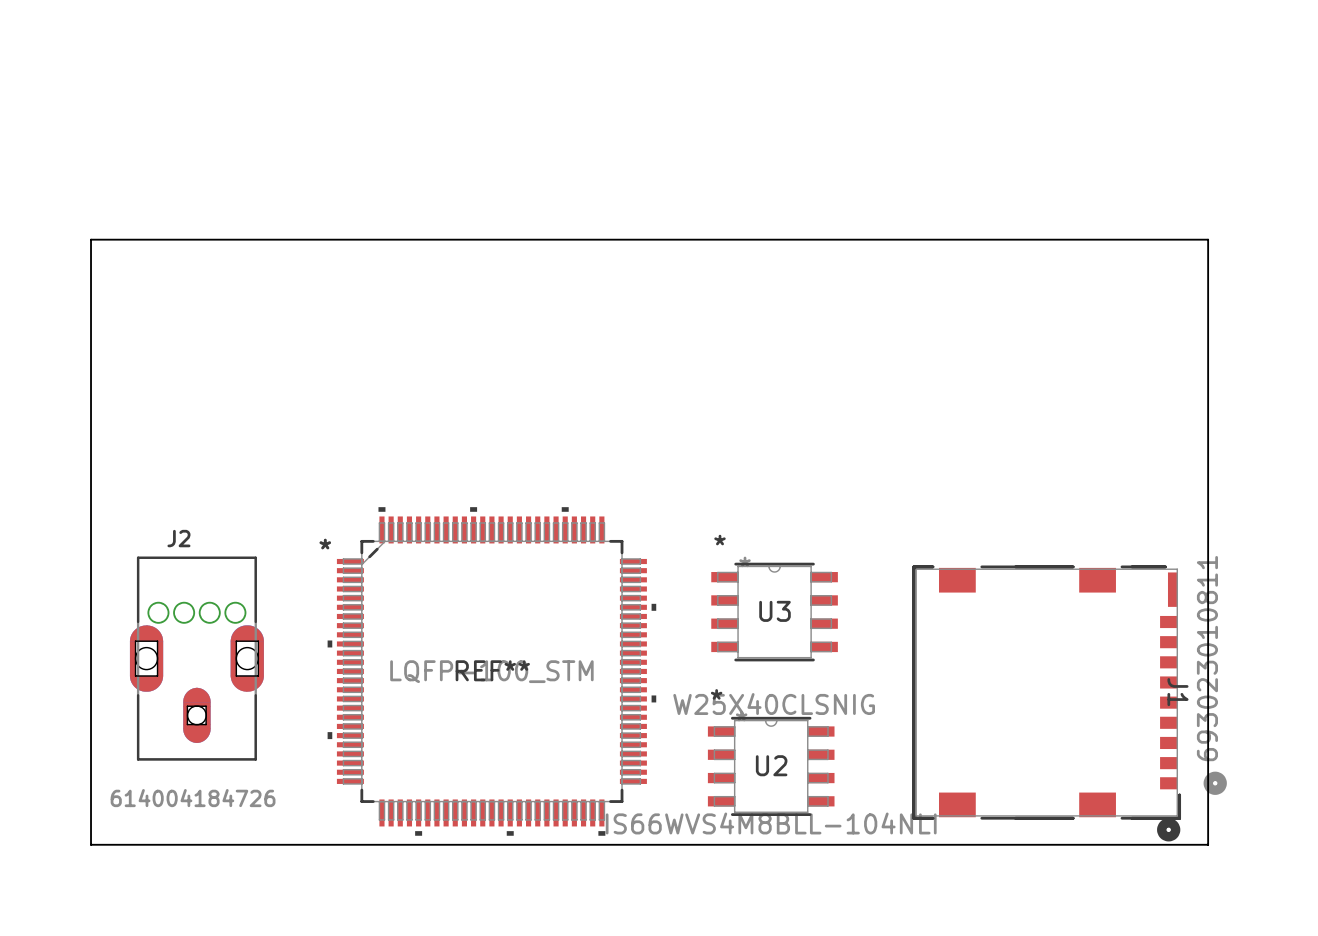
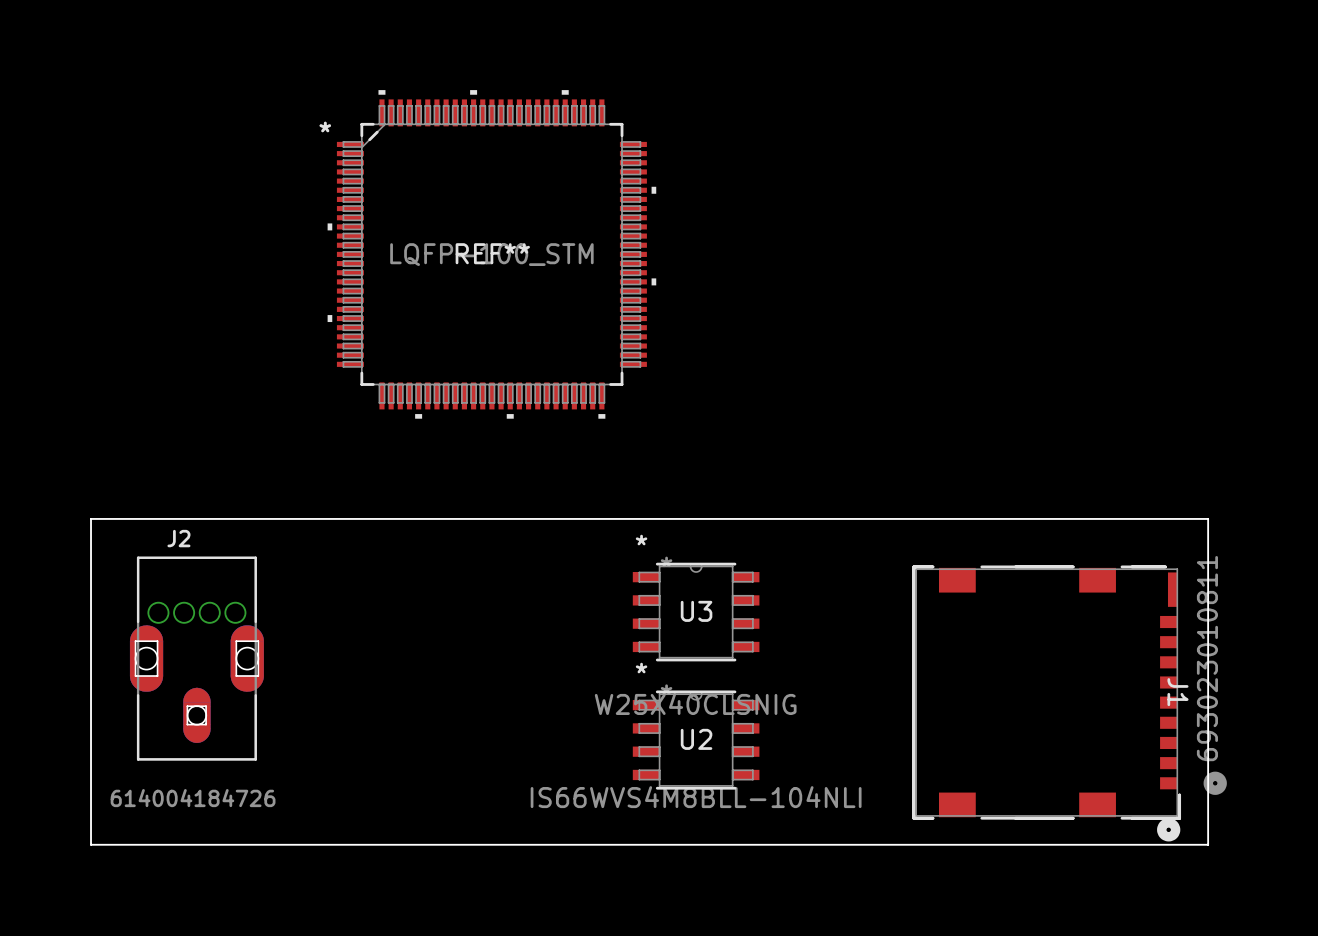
board edge: (91, 518) (91, 239) (1208, 239) (1208, 518) -> (91, 518) (1208, 518)
U3 position: (774, 612) -> (696, 612)
REF** position: (491, 671) -> (491, 254)
U2 position: (771, 766) -> (696, 740)

